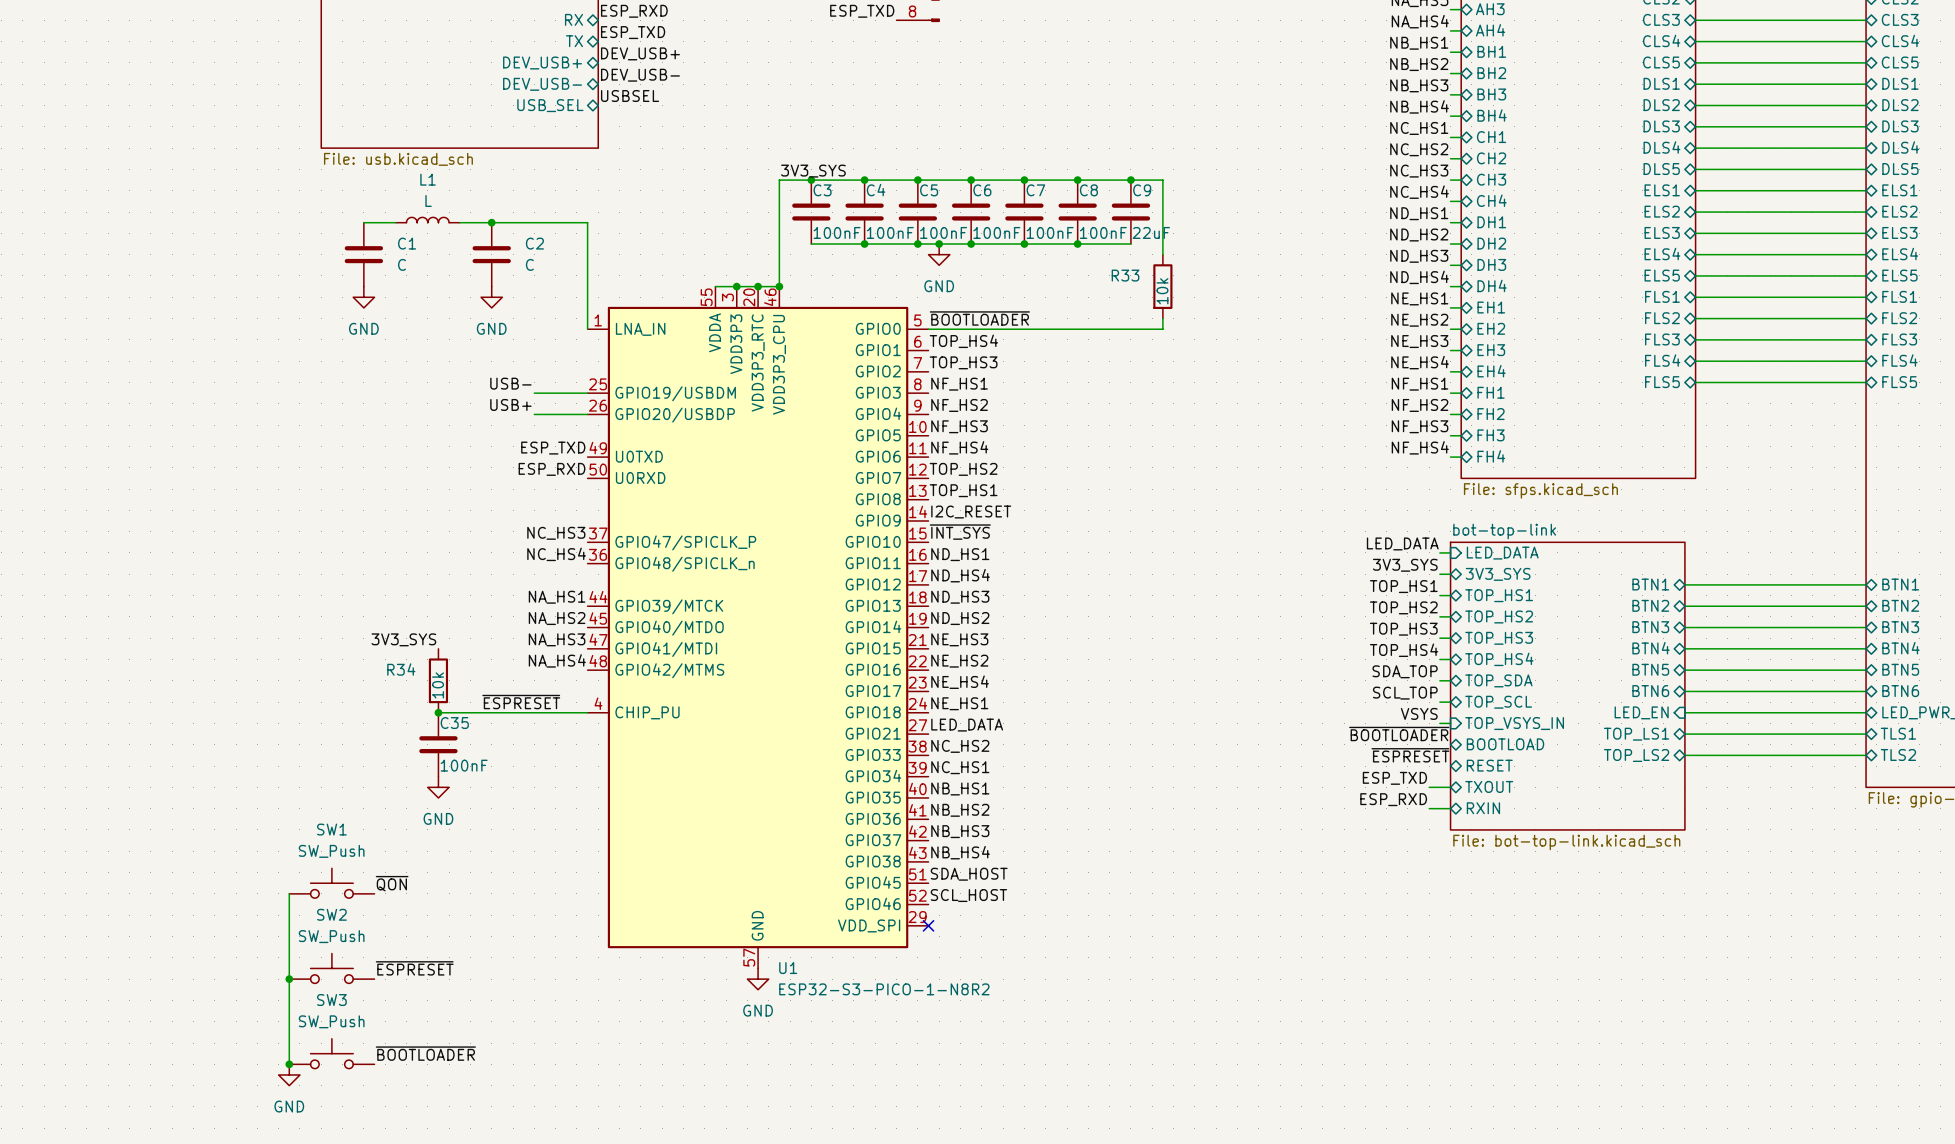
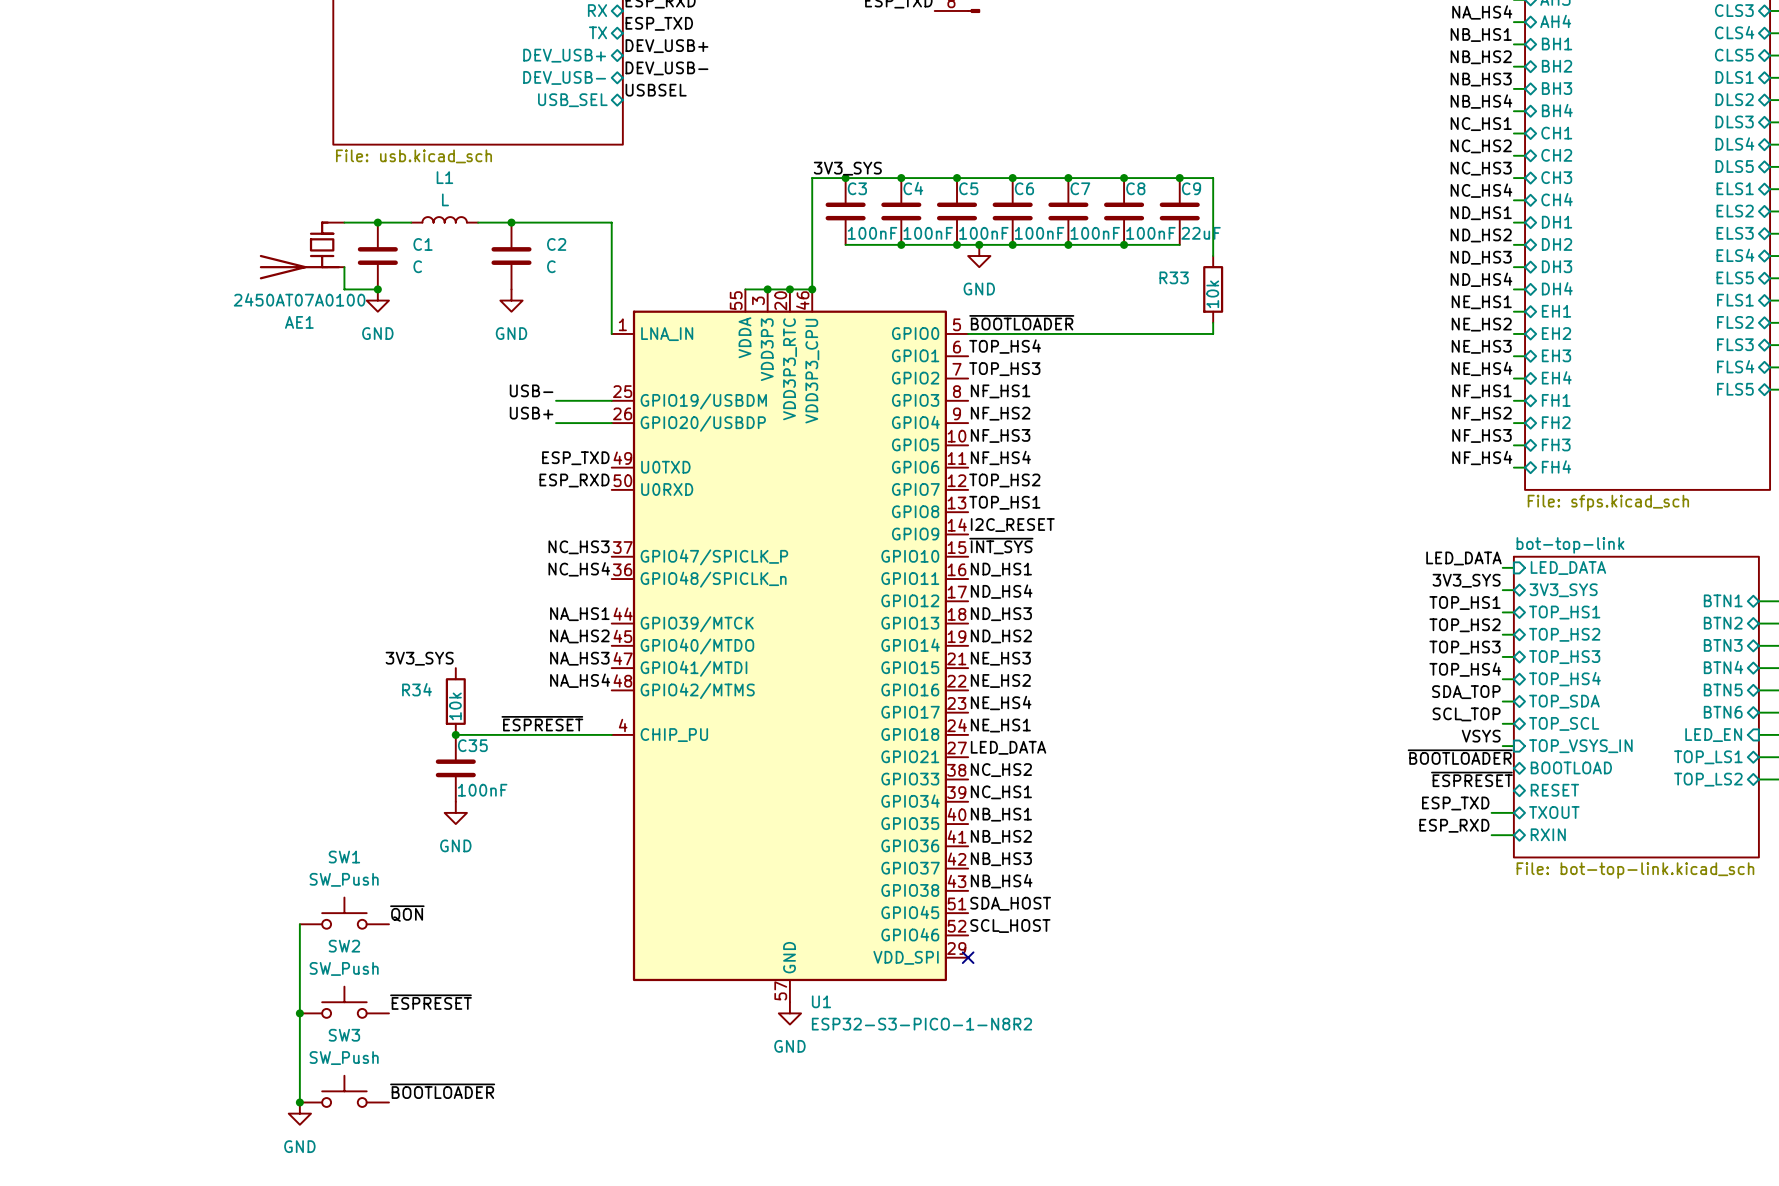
wire: none -> (344, 222) (377, 222)
junction: none -> (377, 222)
AE1: none -> 2450AT07A0100 (302, 250)
wire: none -> (344, 267) (344, 289) (377, 289)
junction: none -> (377, 289)

